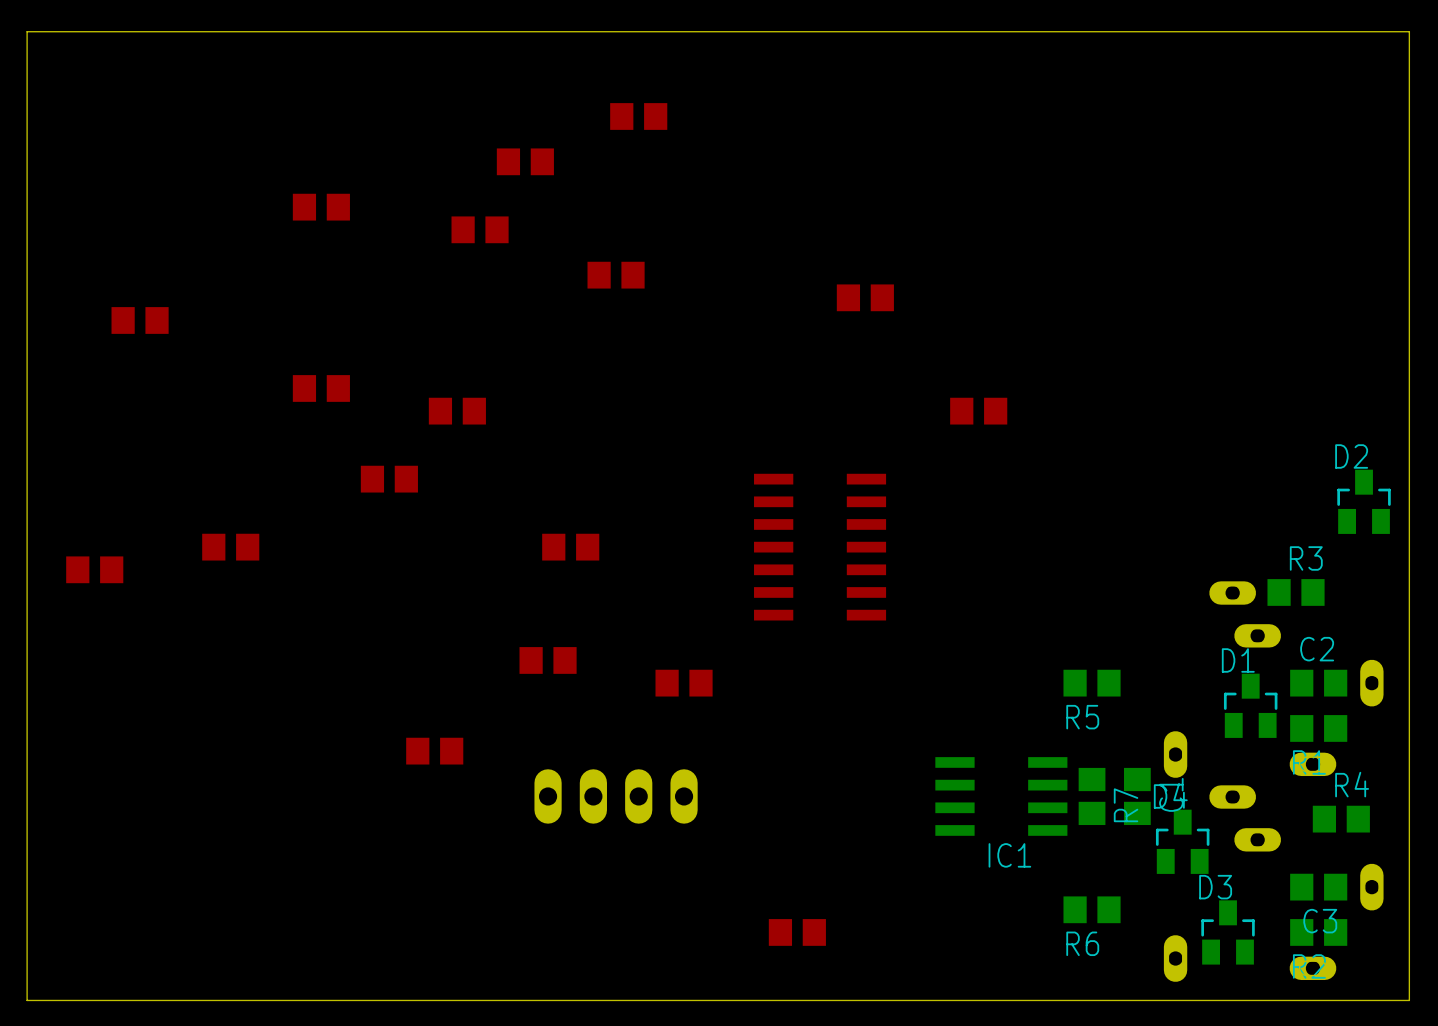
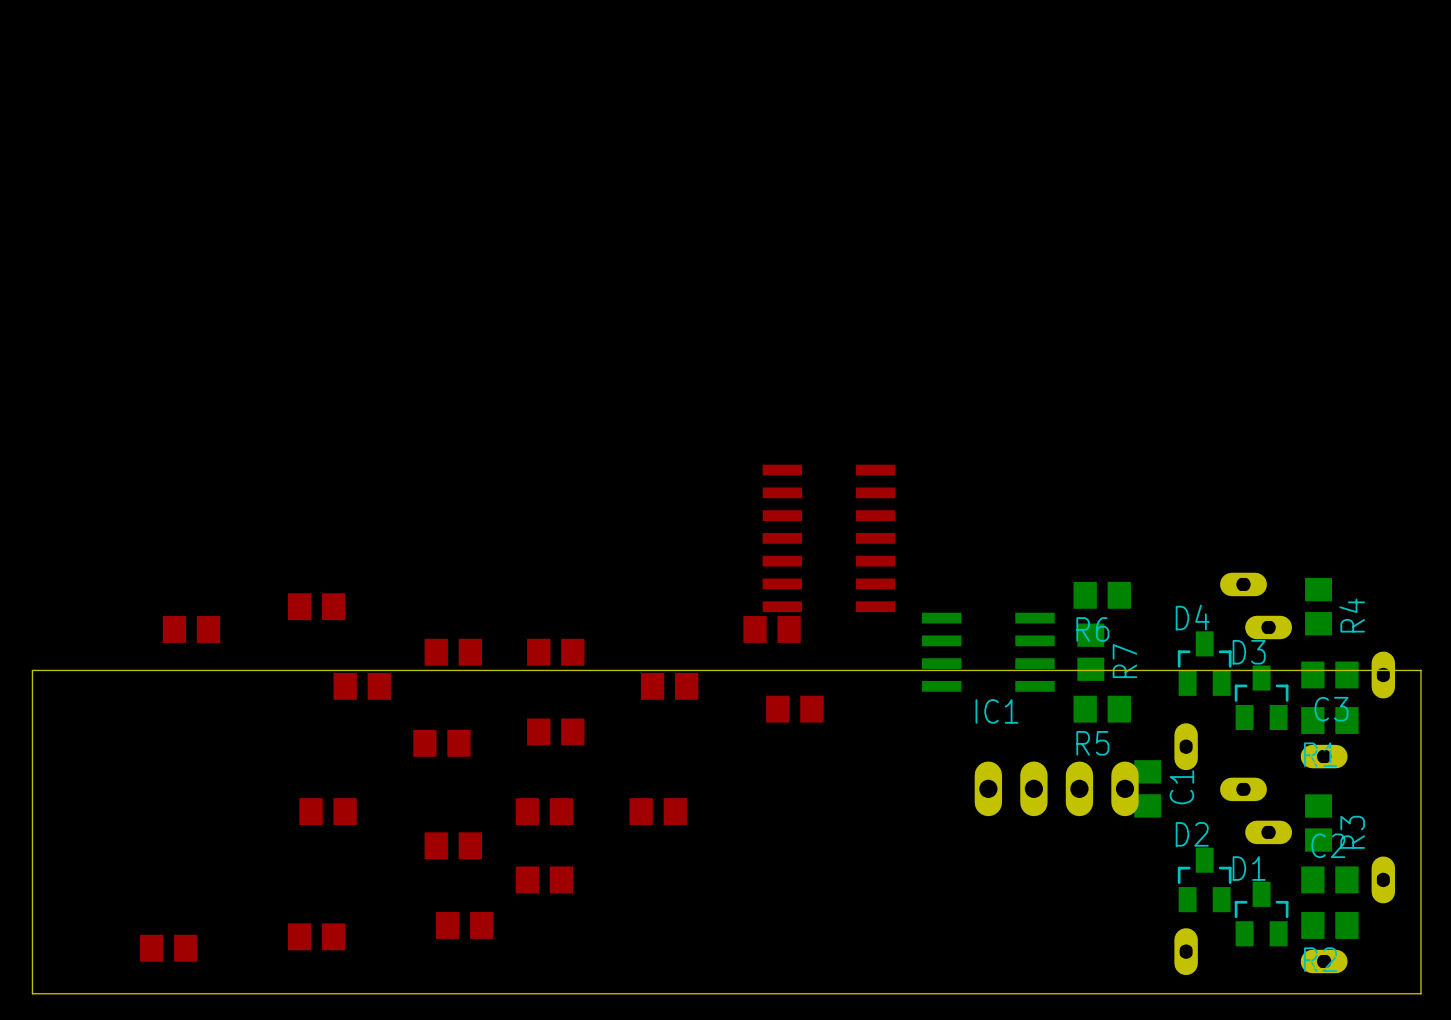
part: (638, 116) -> none
part: (525, 161) -> none
part: (321, 207) -> none
part: (480, 229) -> none
part: (616, 275) -> none
part: (865, 297) -> none
part: (140, 320) -> none
part: (321, 388) -> none
part: (457, 411) -> none
part: (978, 411) -> none
part: (389, 479) -> none
D2 position: (1364, 501) -> (1204, 879)
part: (230, 547) -> none
part: (570, 547) -> none
part: (94, 569) -> none
R3 rotation: 0° (1296, 592) -> 90° clockwise (1318, 822)
R3 position: (1296, 592) -> (1318, 822)
part: none -> (316, 606)
part: none -> (191, 629)
part: none -> (772, 629)
C2 name: C2 (1317, 649) -> C3 (1331, 709)
part: none -> (453, 652)
D1 name: D1 (1238, 660) -> D3 (1249, 652)
board edge: (1409, 678) (1409, 31) (27, 31) (27, 678) -> (1420, 670) (32, 670)
part position: (684, 683) -> (669, 686)
R5 position: (1092, 683) -> (1102, 709)
part: none -> (362, 686)
part: none -> (794, 709)
part: none -> (555, 731)
part position: (616, 796) -> (1056, 788)
IC1 position: (1001, 796) -> (988, 652)
R7 position: (1092, 796) -> (1090, 652)
part: none -> (328, 811)
part: none -> (544, 811)
part: none -> (658, 811)
R4 rotation: 0° (1341, 819) -> 90° clockwise (1318, 606)
R4 position: (1341, 819) -> (1318, 606)
D4 position: (1182, 841) -> (1204, 663)
part: none -> (453, 845)
part: none -> (544, 879)
R6 position: (1092, 909) -> (1102, 595)
D1: none -> (1261, 914)
C3 name: C3 (1320, 921) -> C2 (1328, 845)
part: none -> (464, 925)
part: (797, 932) -> none
D3: (1228, 932) -> none
part: none -> (316, 936)
part: none -> (168, 948)

